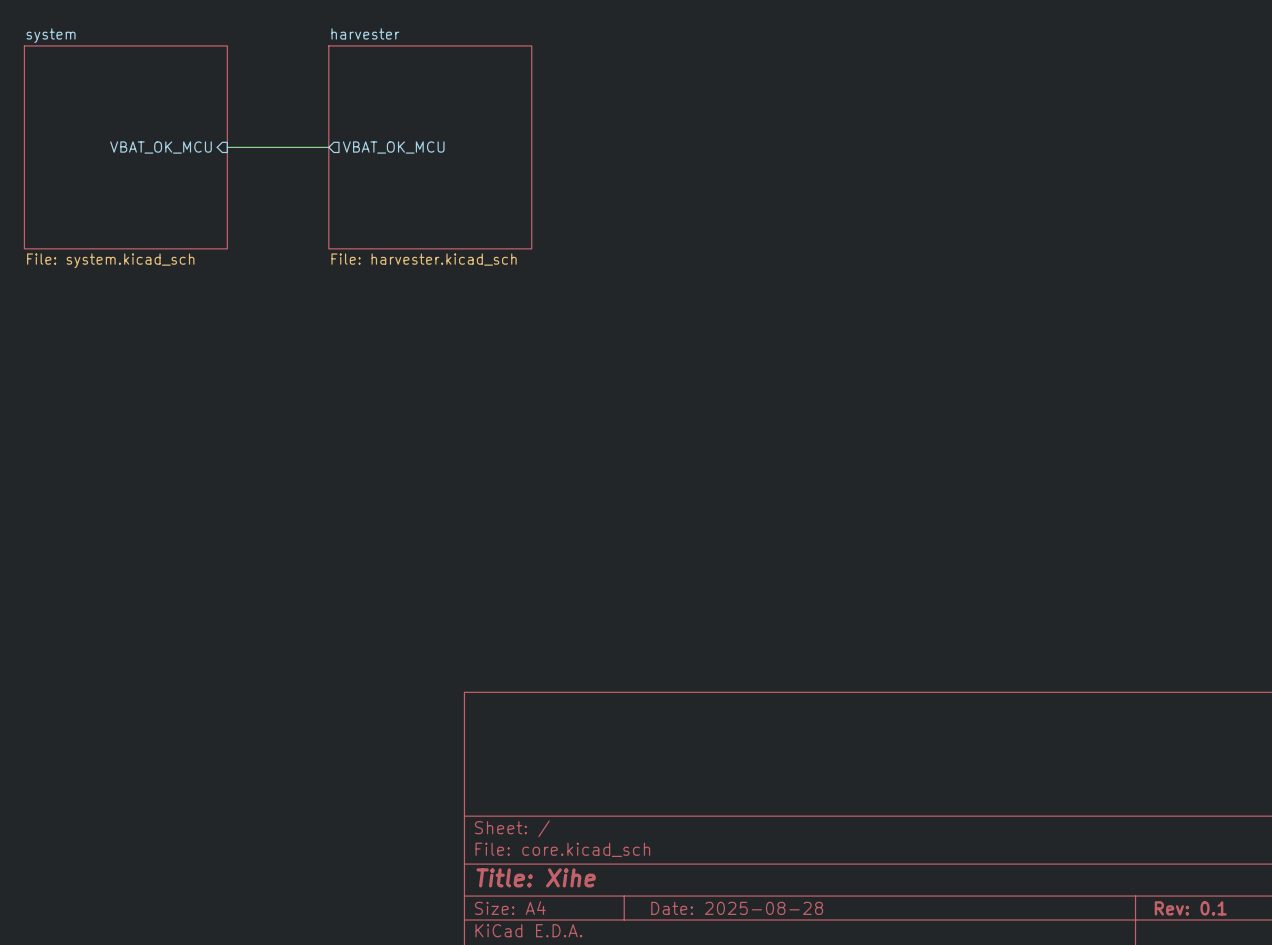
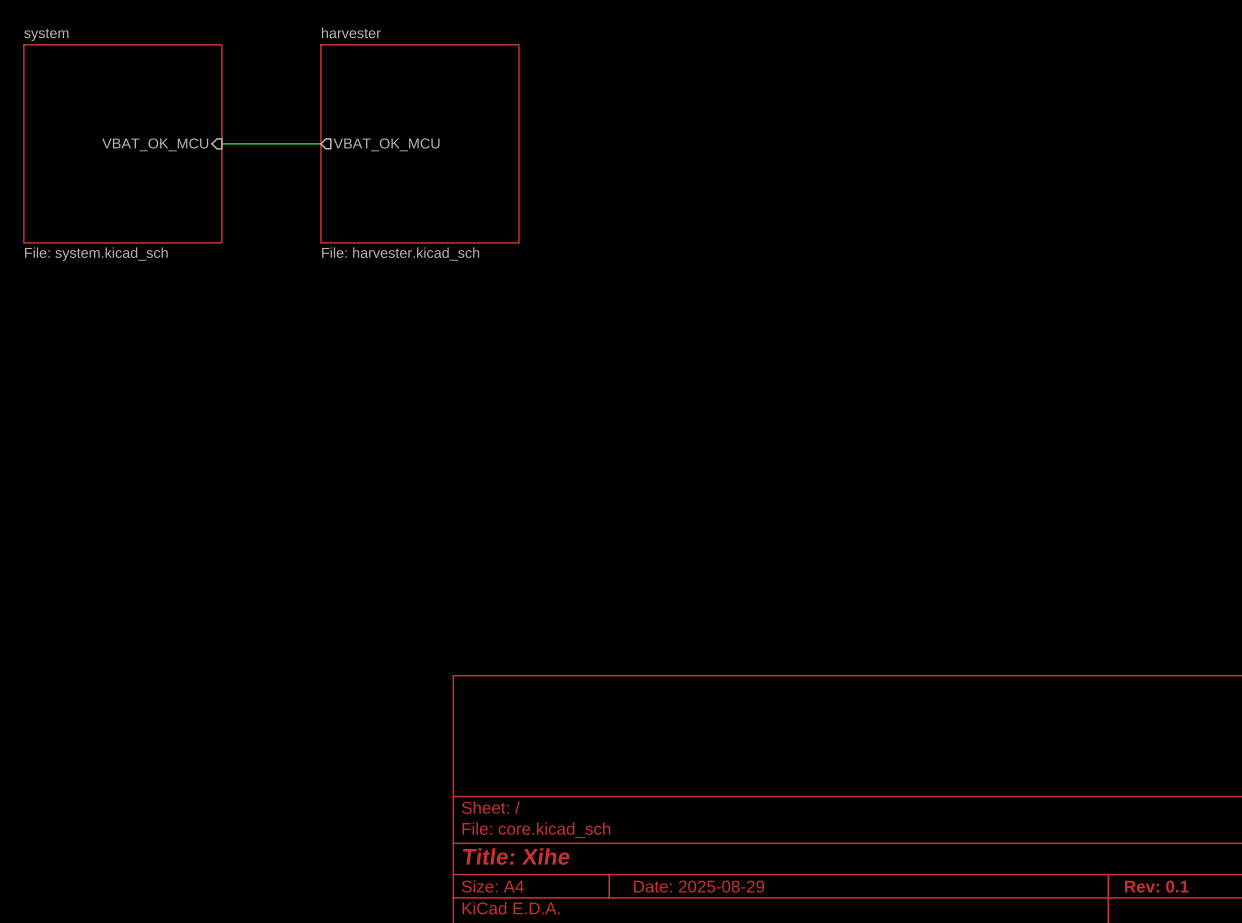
title block: Date: 2025-08-28 (737, 908) -> Date: 2025-08-29 (699, 886)

